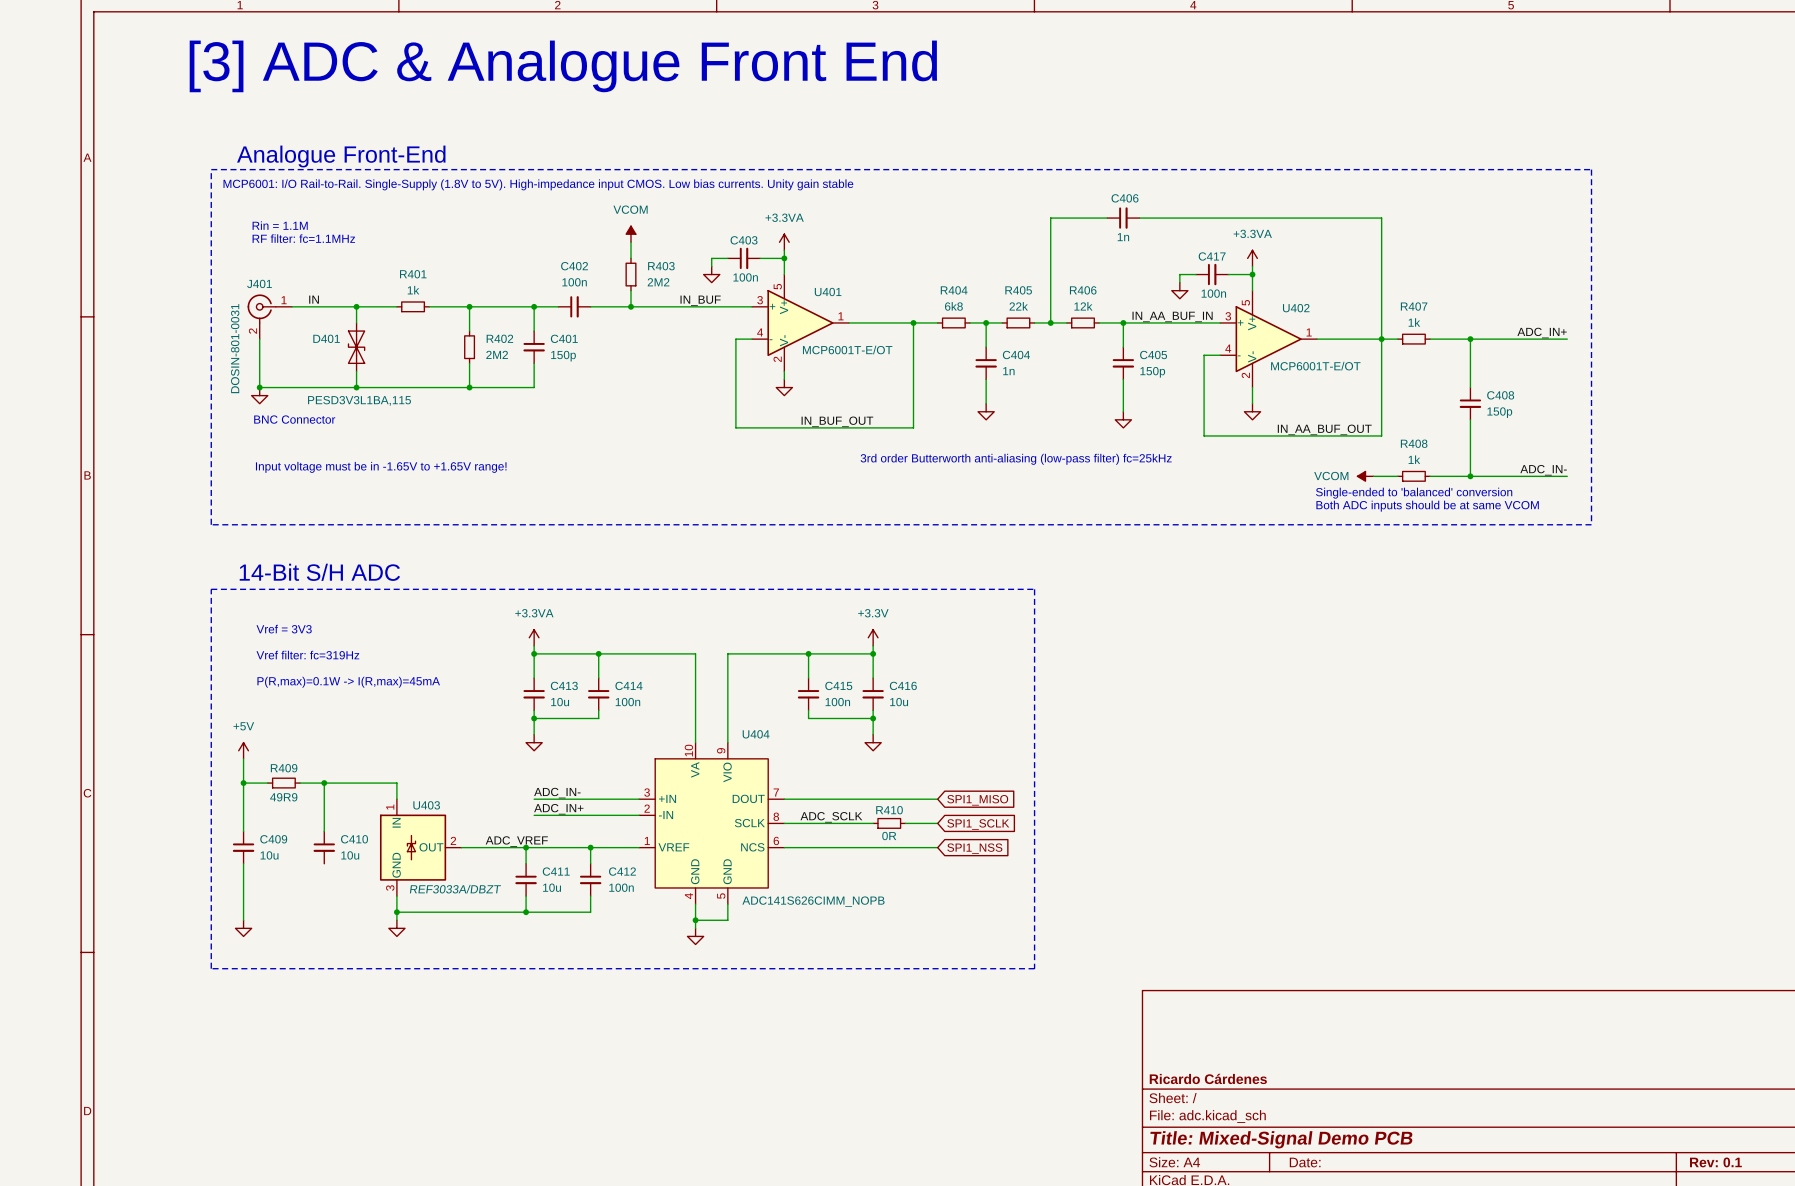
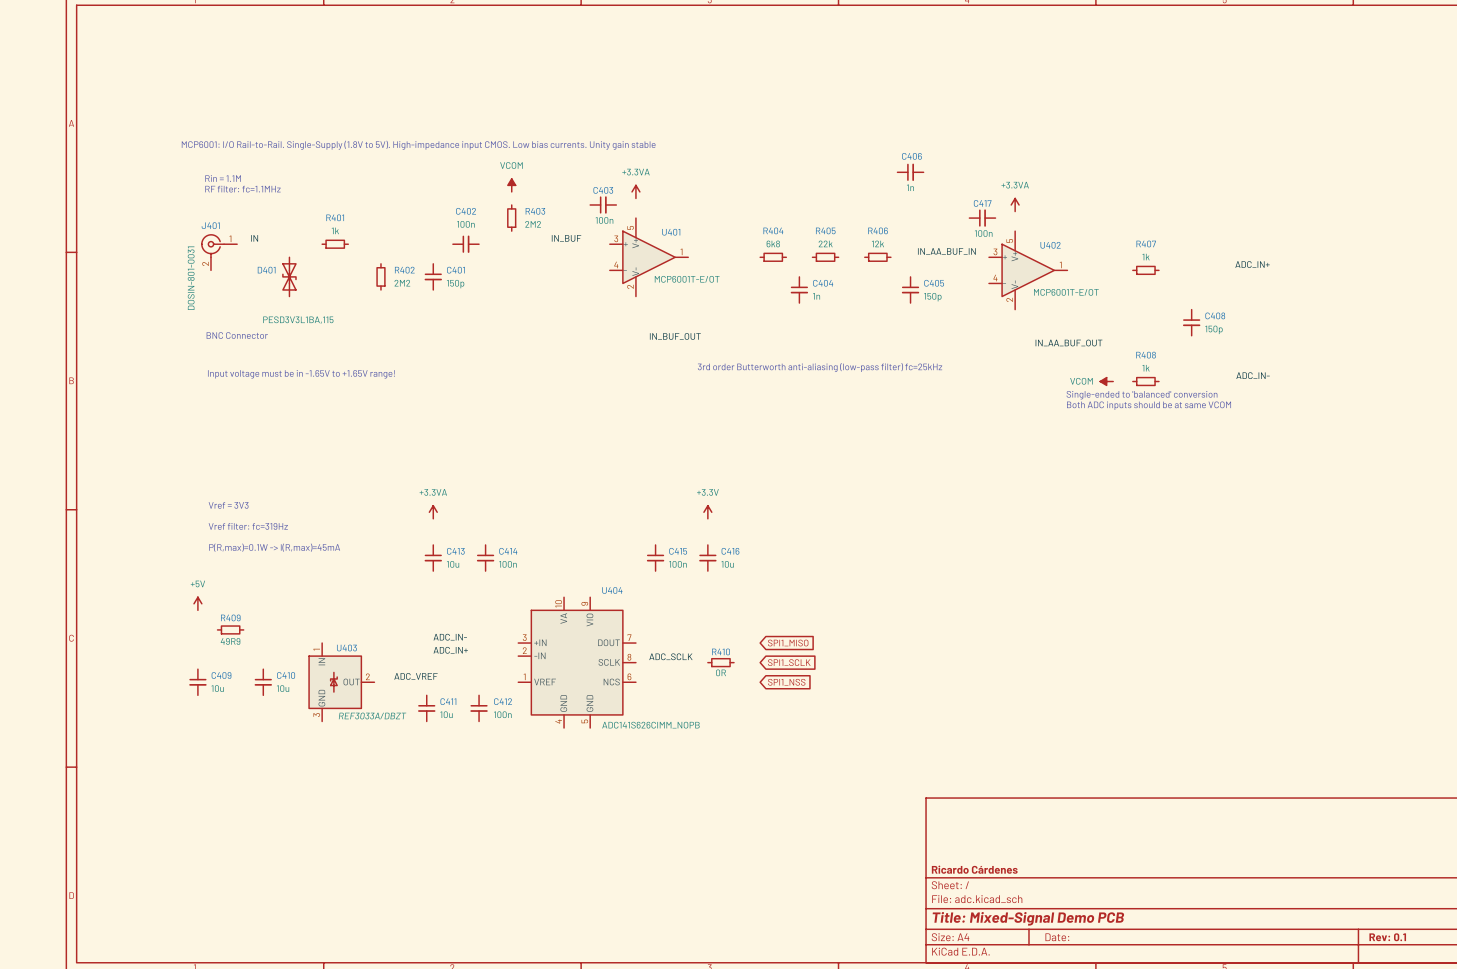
text: [3] ADC & Analogue Front End (563, 66) -> none
text: Analogue Front-End (341, 156) -> none
line: (211, 169) (1591, 169) (1591, 524) (211, 524) (211, 169) -> none
wire: (1107, 218) (1050, 218) (1050, 322) -> none
wire: (1139, 218) (1381, 218) (1381, 435) (1204, 435) (1204, 355) (1220, 355) -> none
wire: (630, 242) (630, 258) -> none
wire: (784, 250) (784, 274) -> none
wire: (727, 258) (711, 258) (711, 266) -> none
wire: (760, 258) (784, 258) -> none
junction: (784, 258) -> none
wire: (1252, 266) (1252, 290) -> none
power symbol: (711, 274) -> none
wire: (1196, 274) (1179, 274) (1179, 282) -> none
wire: (1228, 274) (1252, 274) -> none
junction: (1252, 274) -> none
wire: (630, 290) (630, 306) -> none
power symbol: (1179, 290) -> none
wire: (291, 306) (396, 306) -> none
wire: (356, 306) (356, 322) -> none
junction: (356, 306) -> none
wire: (429, 306) (558, 306) -> none
wire: (469, 306) (469, 331) -> none
junction: (469, 306) -> none
wire: (534, 306) (534, 331) -> none
junction: (534, 306) -> none
wire: (590, 306) (752, 306) -> none
junction: (630, 306) -> none
wire: (848, 322) (937, 322) -> none
wire: (913, 322) (913, 427) (735, 427) (735, 339) (752, 339) -> none
junction: (913, 322) -> none
wire: (969, 322) (1002, 322) -> none
wire: (986, 322) (986, 347) -> none
junction: (986, 322) -> none
wire: (1034, 322) (1066, 322) -> none
junction: (1050, 322) -> none
wire: (1099, 322) (1220, 322) -> none
wire: (1123, 322) (1123, 347) -> none
junction: (1123, 322) -> none
wire: (259, 339) (259, 387) (534, 387) (534, 363) -> none
wire: (1317, 339) (1397, 339) -> none
junction: (1381, 339) -> none
wire: (1430, 339) (1567, 339) -> none
wire: (1470, 339) (1470, 387) -> none
junction: (1470, 339) -> none
wire: (469, 363) (469, 387) -> none
wire: (356, 371) (356, 387) -> none
wire: (784, 371) (784, 379) -> none
wire: (986, 379) (986, 403) -> none
wire: (1123, 379) (1123, 411) -> none
junction: (259, 387) -> none
junction: (356, 387) -> none
junction: (469, 387) -> none
power symbol: (784, 387) -> none
wire: (1252, 387) (1252, 403) -> none
power symbol: (259, 395) -> none
power symbol: (986, 411) -> none
power symbol: (1252, 411) -> none
power symbol: (1123, 419) -> none
wire: (1470, 419) (1470, 476) -> none
wire: (1373, 476) (1397, 476) -> none
wire: (1430, 476) (1567, 476) -> none
junction: (1470, 476) -> none
text: 14-Bit S/H ADC (319, 572) -> none
line: (211, 589) (211, 968) (1034, 968) (1034, 589) (211, 589) -> none
wire: (534, 645) (534, 678) -> none
wire: (873, 645) (873, 678) -> none
wire: (534, 653) (695, 653) (695, 742) -> none
junction: (534, 653) -> none
wire: (598, 653) (598, 678) -> none
junction: (598, 653) -> none
wire: (808, 653) (808, 678) -> none
junction: (808, 653) -> none
wire: (873, 653) (727, 653) (727, 742) -> none
junction: (873, 653) -> none
wire: (534, 710) (534, 734) -> none
wire: (598, 710) (598, 718) (534, 718) -> none
wire: (808, 710) (808, 718) (873, 718) -> none
wire: (873, 710) (873, 734) -> none
junction: (534, 718) -> none
junction: (873, 718) -> none
power symbol: (534, 742) -> none
power symbol: (873, 742) -> none
wire: (243, 758) (243, 831) -> none
wire: (243, 783) (267, 783) -> none
junction: (243, 783) -> none
wire: (300, 783) (396, 783) (396, 799) -> none
wire: (324, 783) (324, 831) -> none
junction: (324, 783) -> none
wire: (534, 799) (639, 799) -> none
wire: (784, 799) (937, 799) -> none
wire: (534, 815) (639, 815) -> none
wire: (784, 823) (873, 823) -> none
wire: (905, 823) (937, 823) -> none
wire: (461, 847) (639, 847) -> none
wire: (526, 847) (526, 863) -> none
junction: (526, 847) -> none
wire: (590, 847) (590, 863) -> none
junction: (590, 847) -> none
wire: (784, 847) (937, 847) -> none
wire: (243, 863) (243, 920) -> none
wire: (396, 896) (396, 920) -> none
wire: (526, 896) (526, 912) -> none
wire: (590, 896) (590, 912) (396, 912) -> none
wire: (695, 904) (695, 928) -> none
wire: (727, 904) (727, 920) (695, 920) -> none
junction: (396, 912) -> none
junction: (526, 912) -> none
junction: (695, 920) -> none
power symbol: (243, 928) -> none
power symbol: (396, 928) -> none
power symbol: (695, 936) -> none

